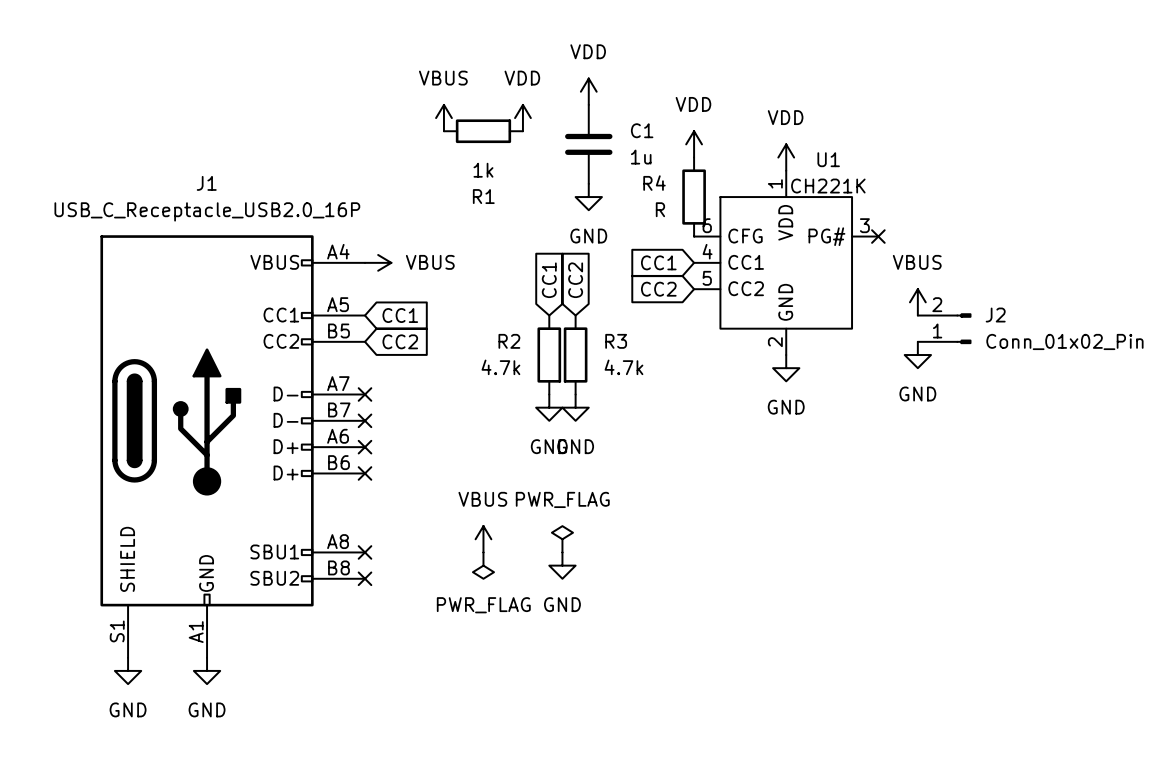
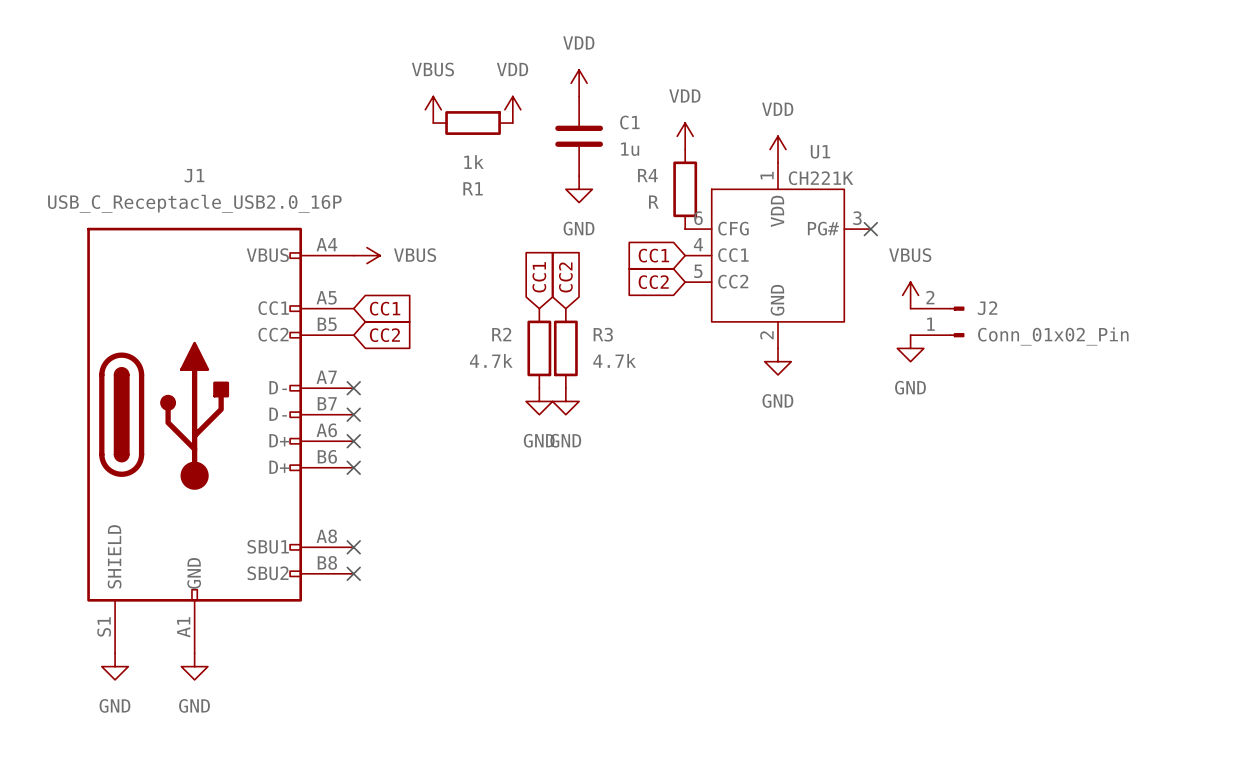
power symbol: VBUS (483, 539) -> none
power symbol: PWR_FLAG (562, 539) -> none
power symbol: PWR_FLAG (483, 565) -> none
power symbol: GND (562, 565) -> none

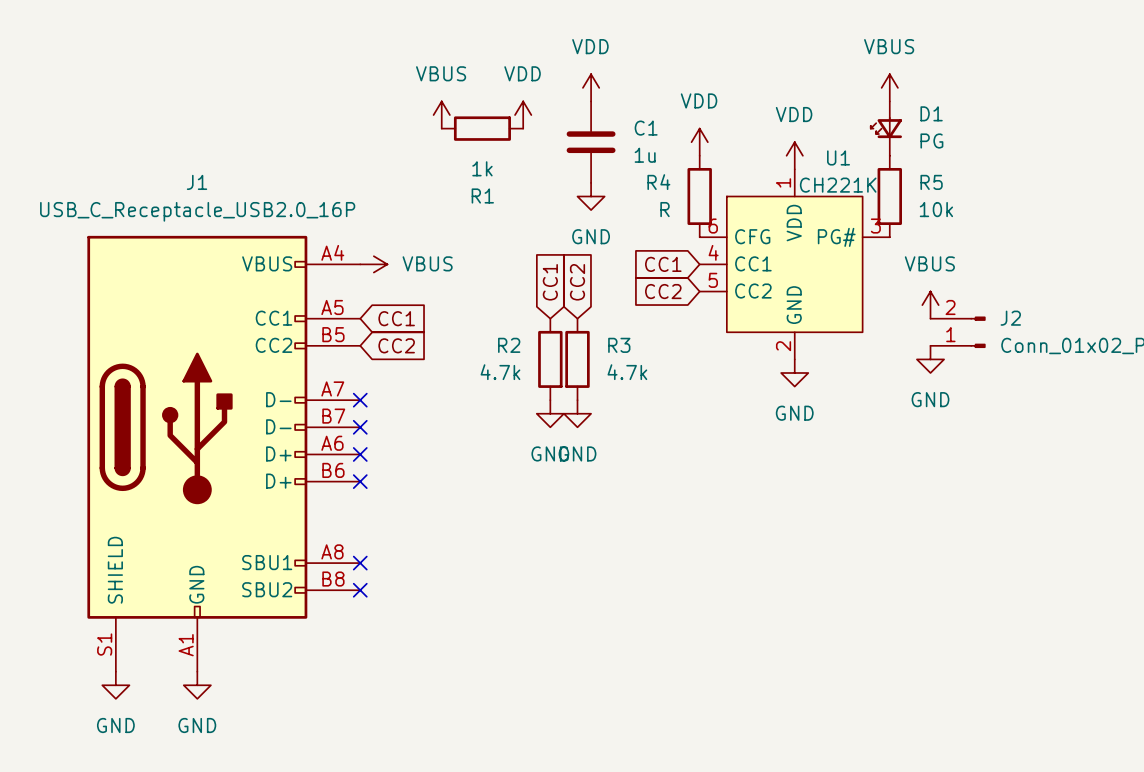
power symbol: none -> VBUS (889, 87)
D1: none -> PG (886, 128)
R5: none -> 10k (889, 196)
no-connect mark: (870, 229) -> none

